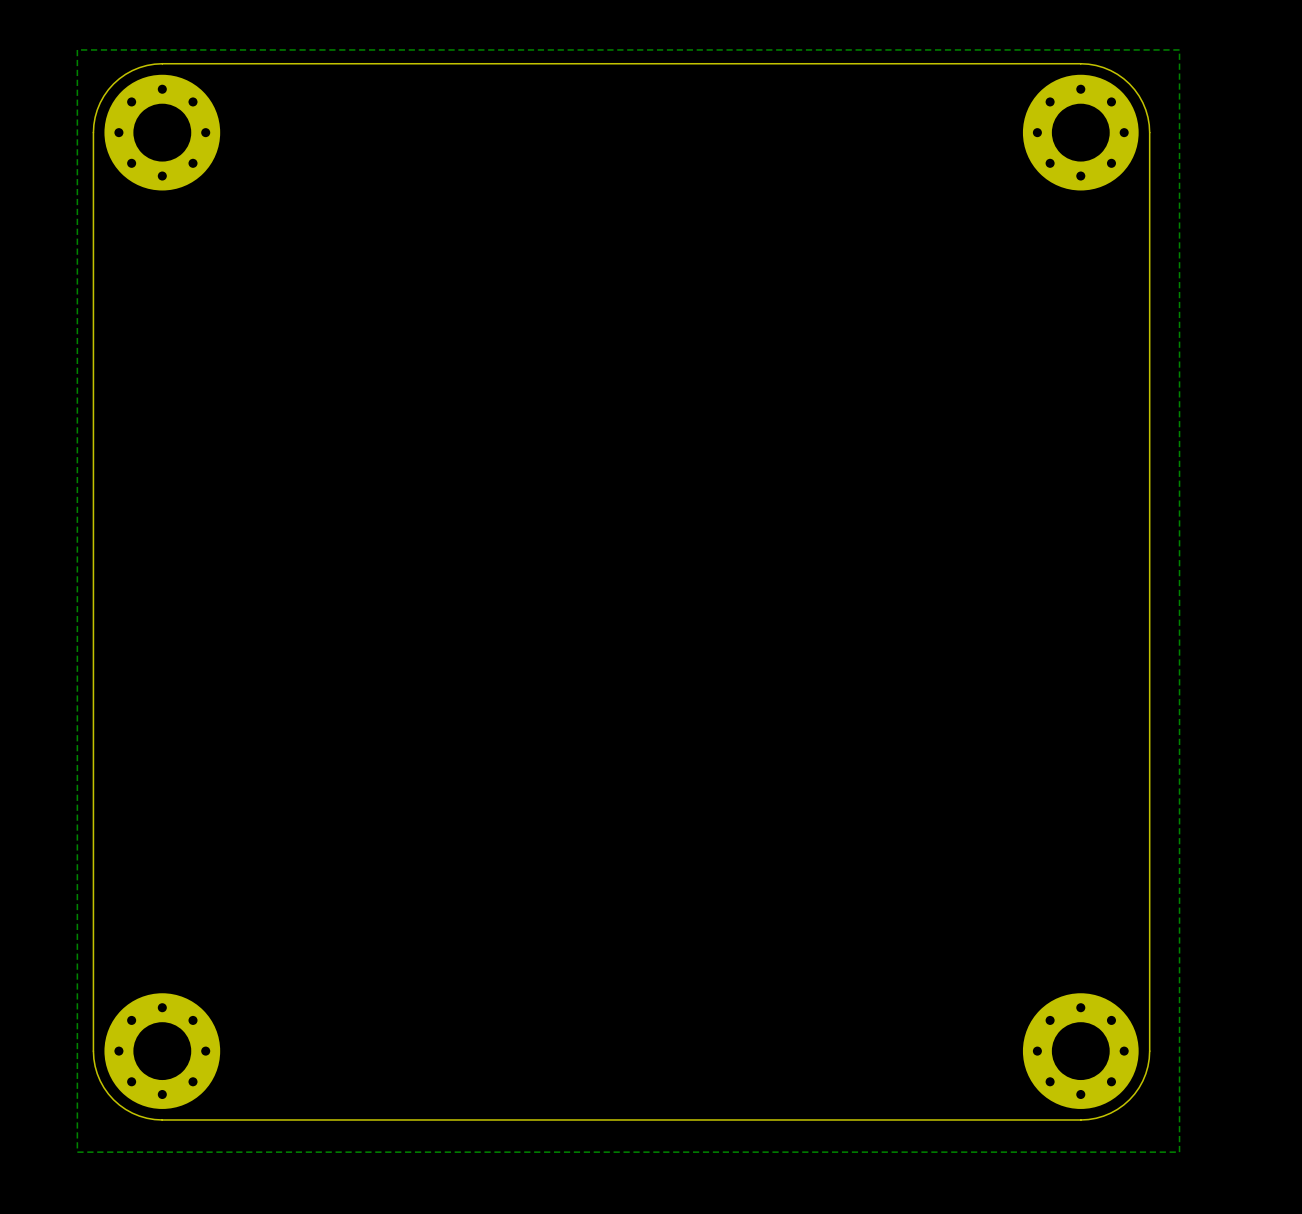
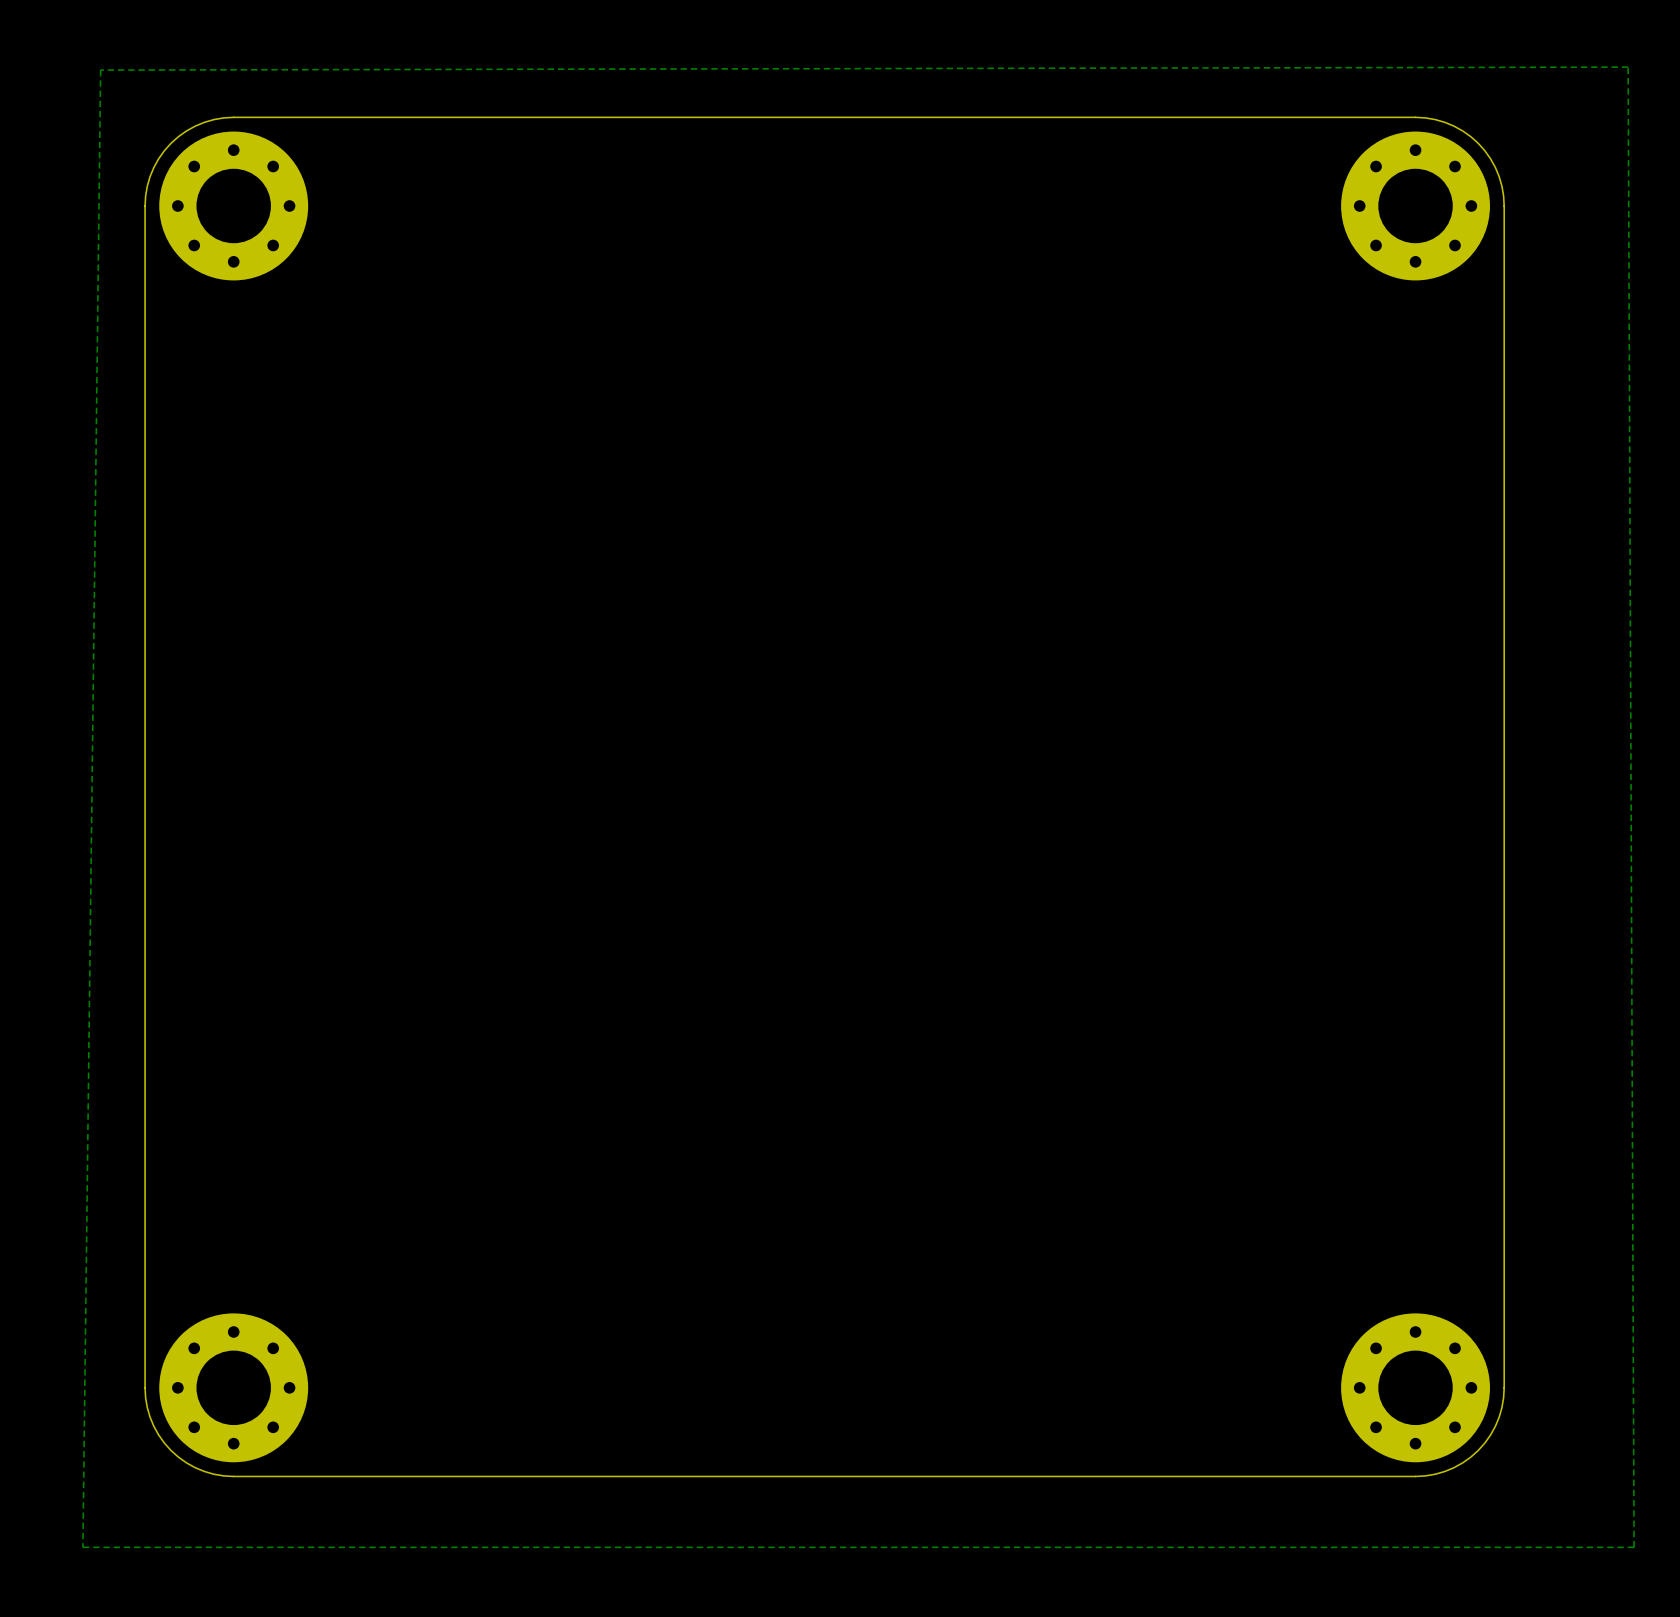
zone outline: (1179, 49) (77, 49) (77, 1152) (1179, 1152) (1179, 49) -> (1628, 67) (1634, 1547) (82, 1547) (100, 70) (1628, 67)

